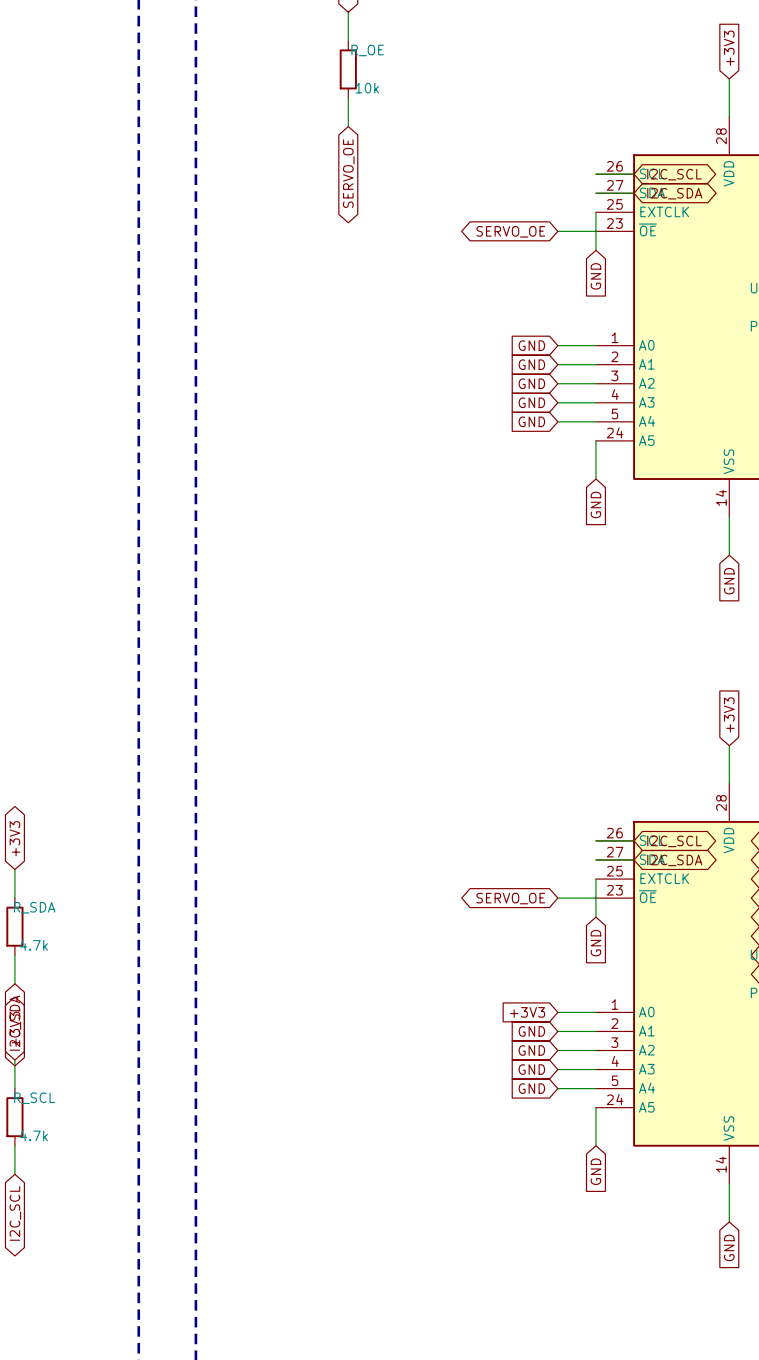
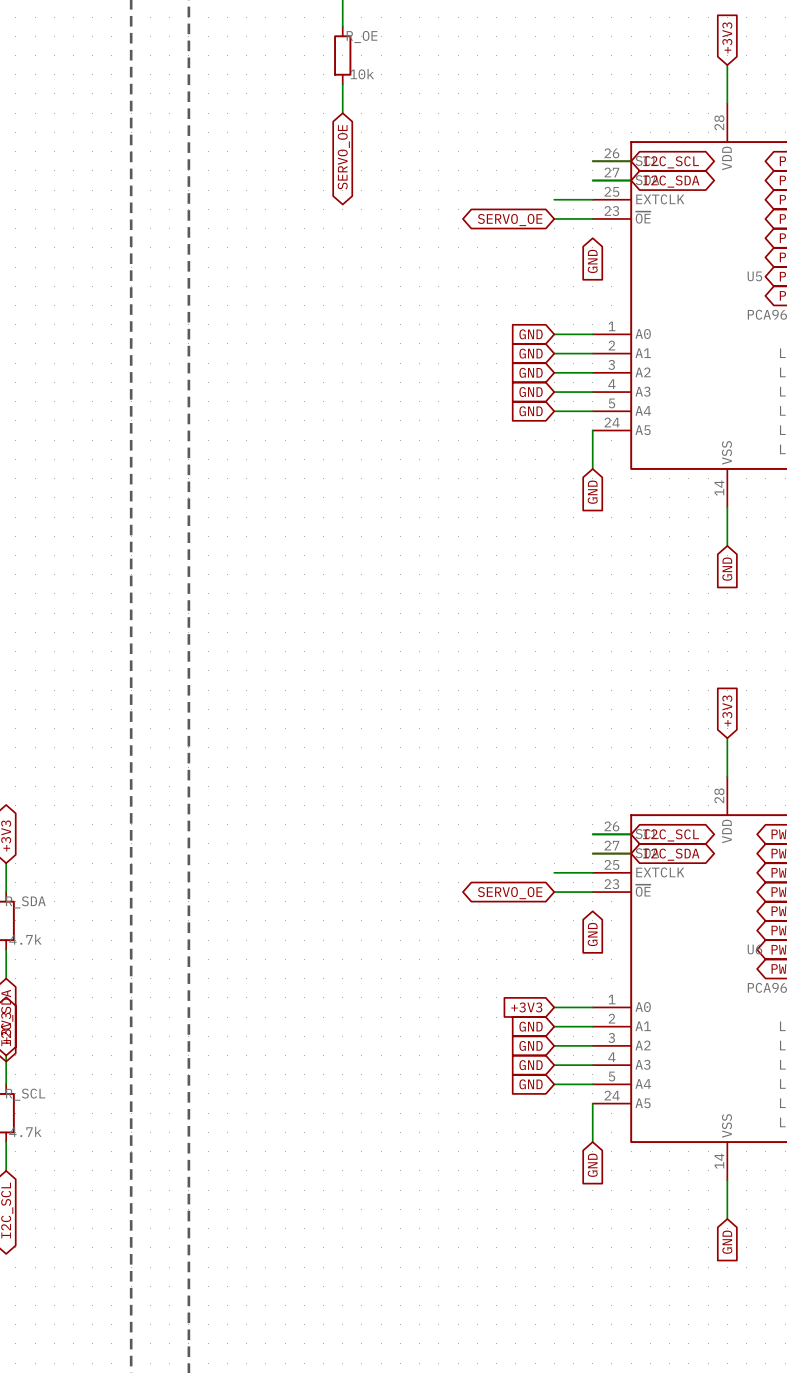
wire: (595, 212) (595, 250) -> (592, 199) (554, 199)
wire: (595, 879) (595, 917) -> (592, 872) (554, 872)

